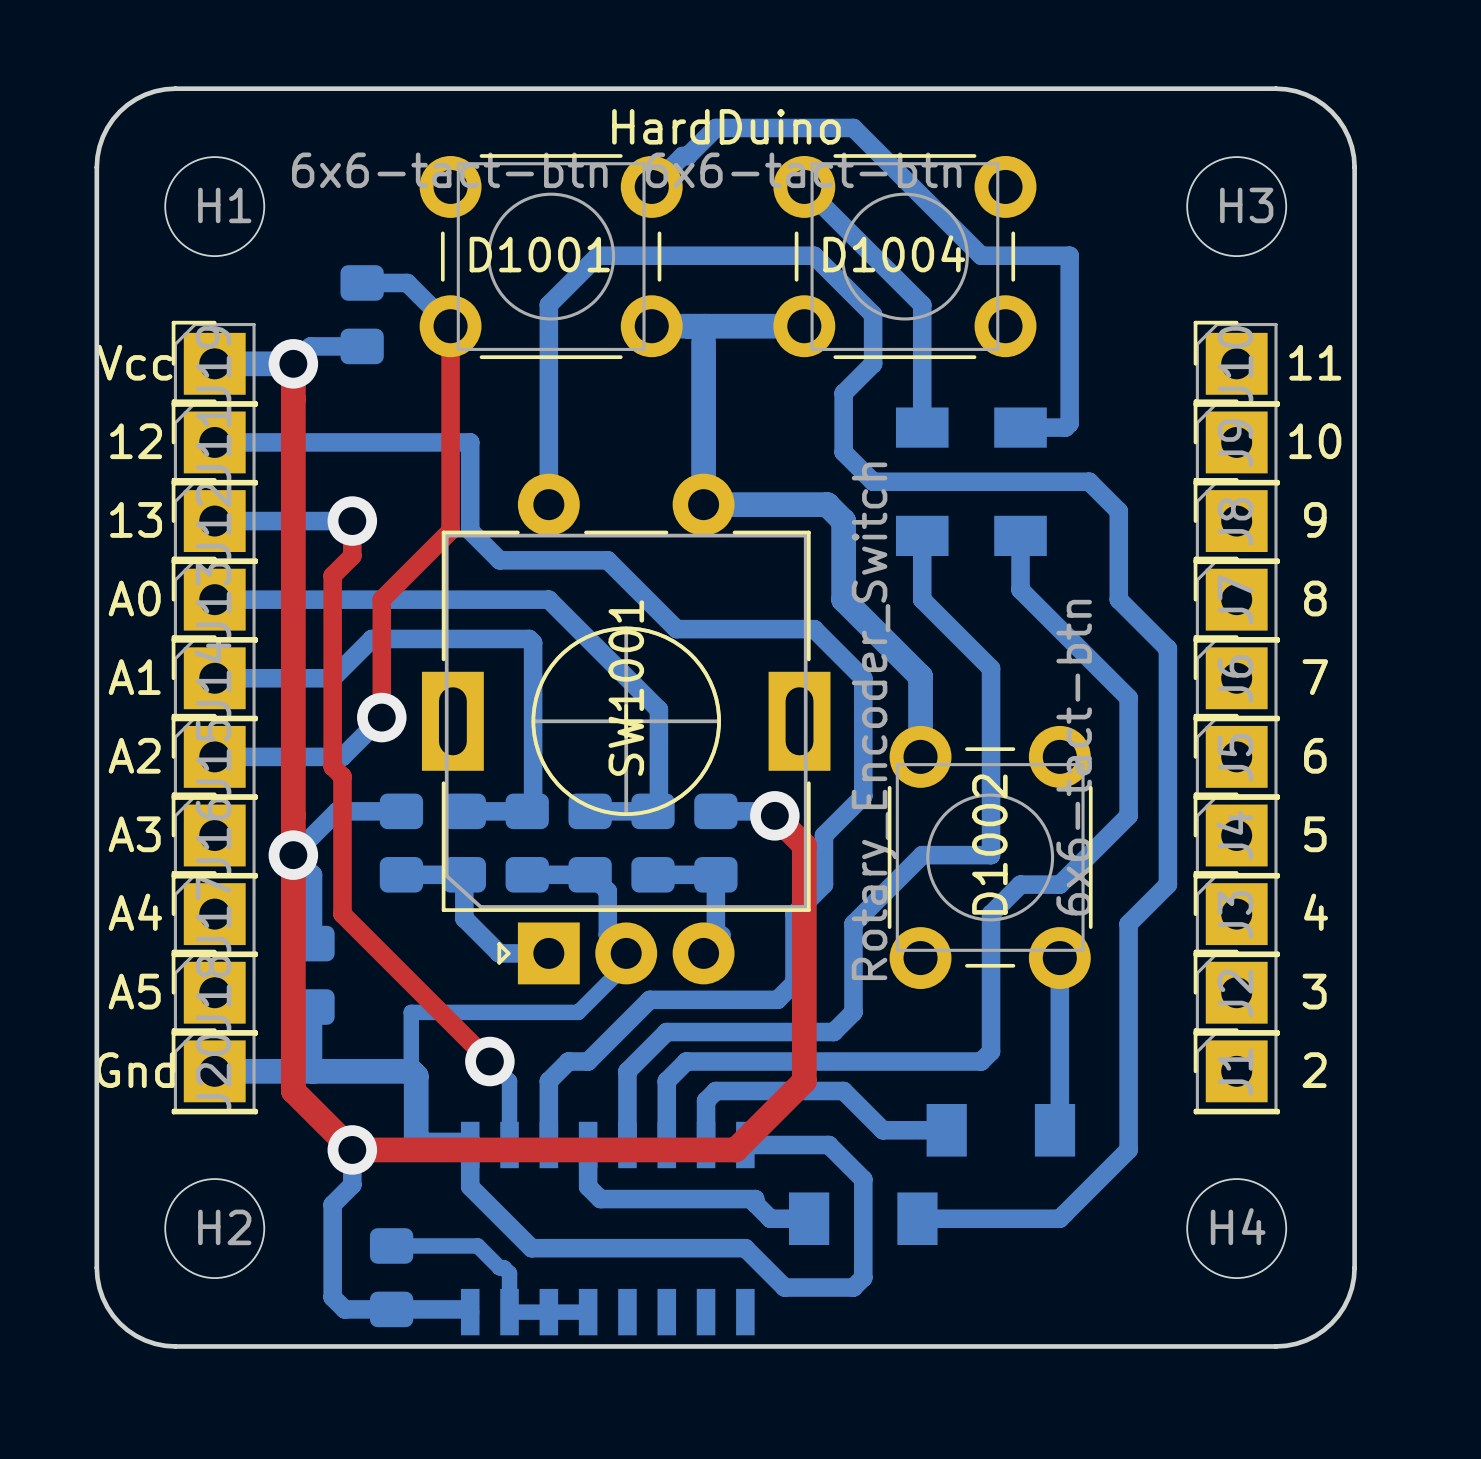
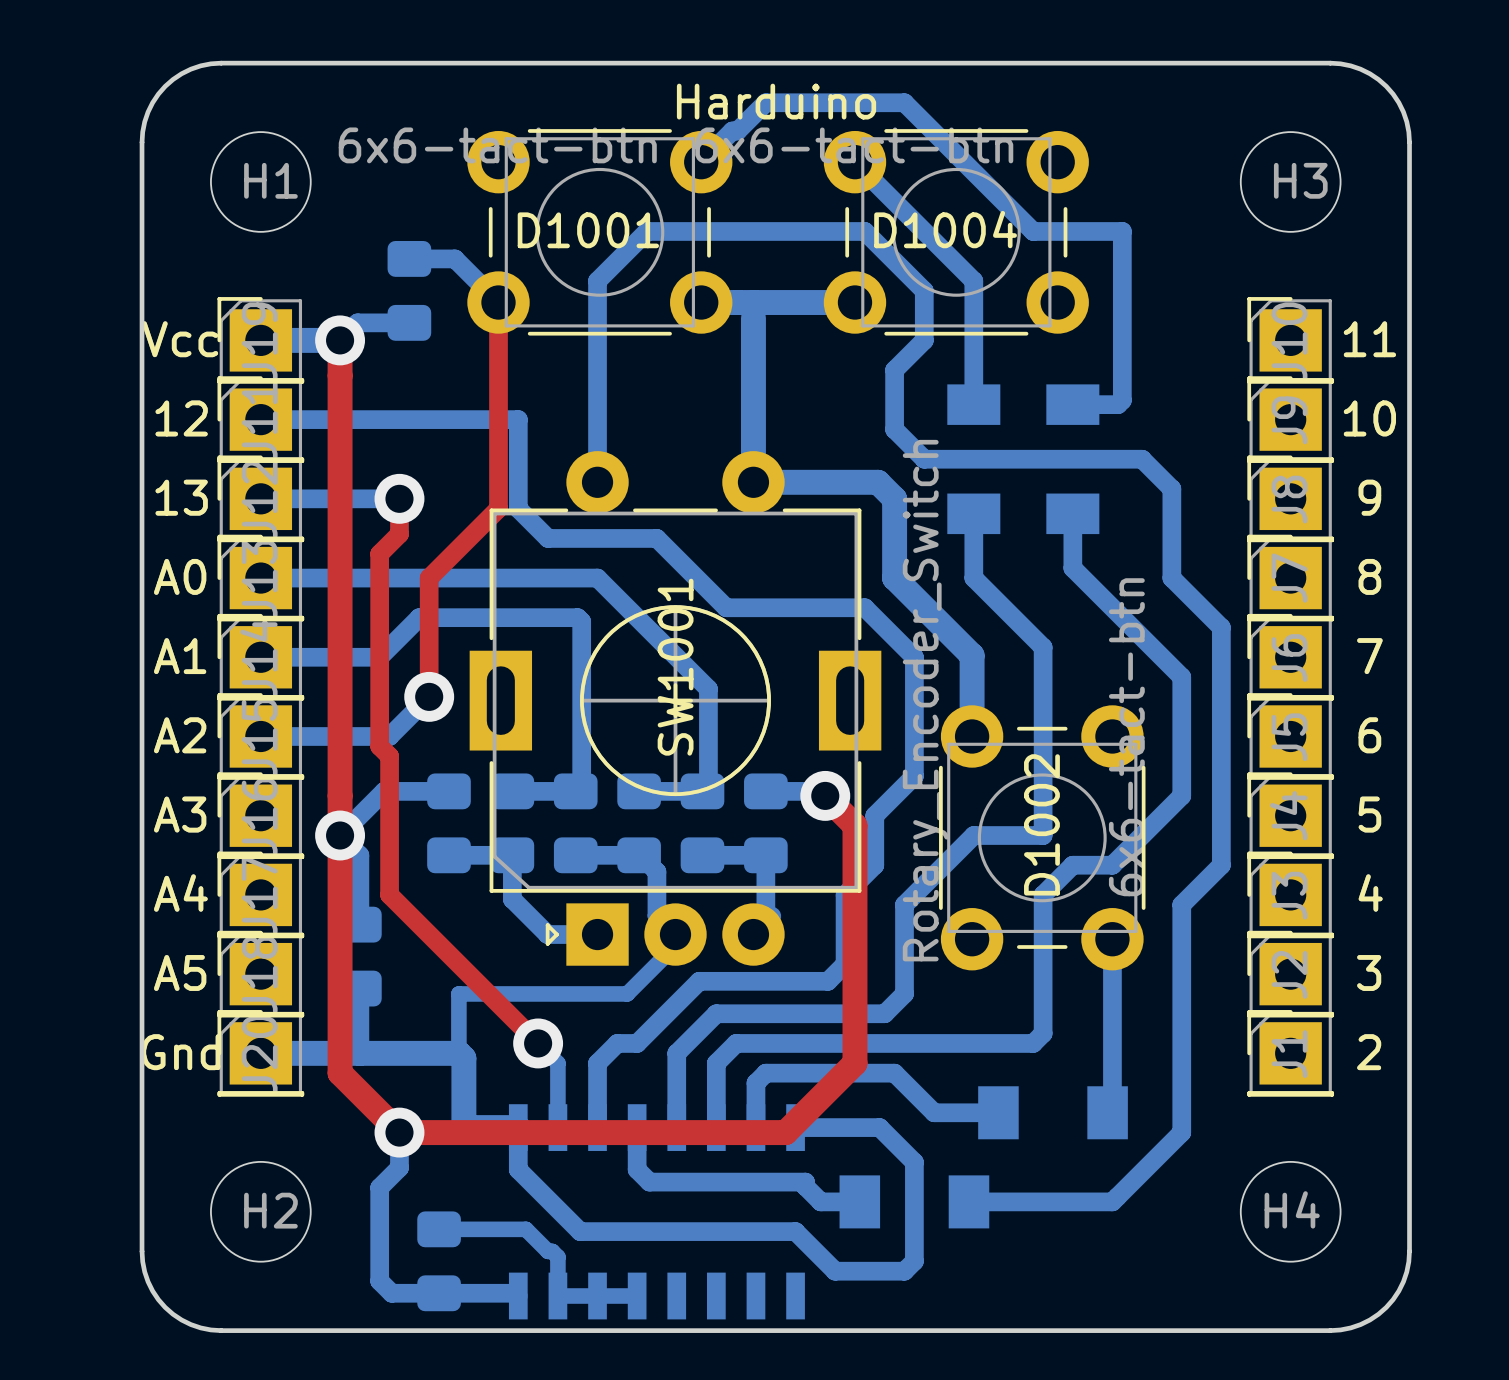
text: HardDuino (726, 126) -> Harduino (776, 101)

